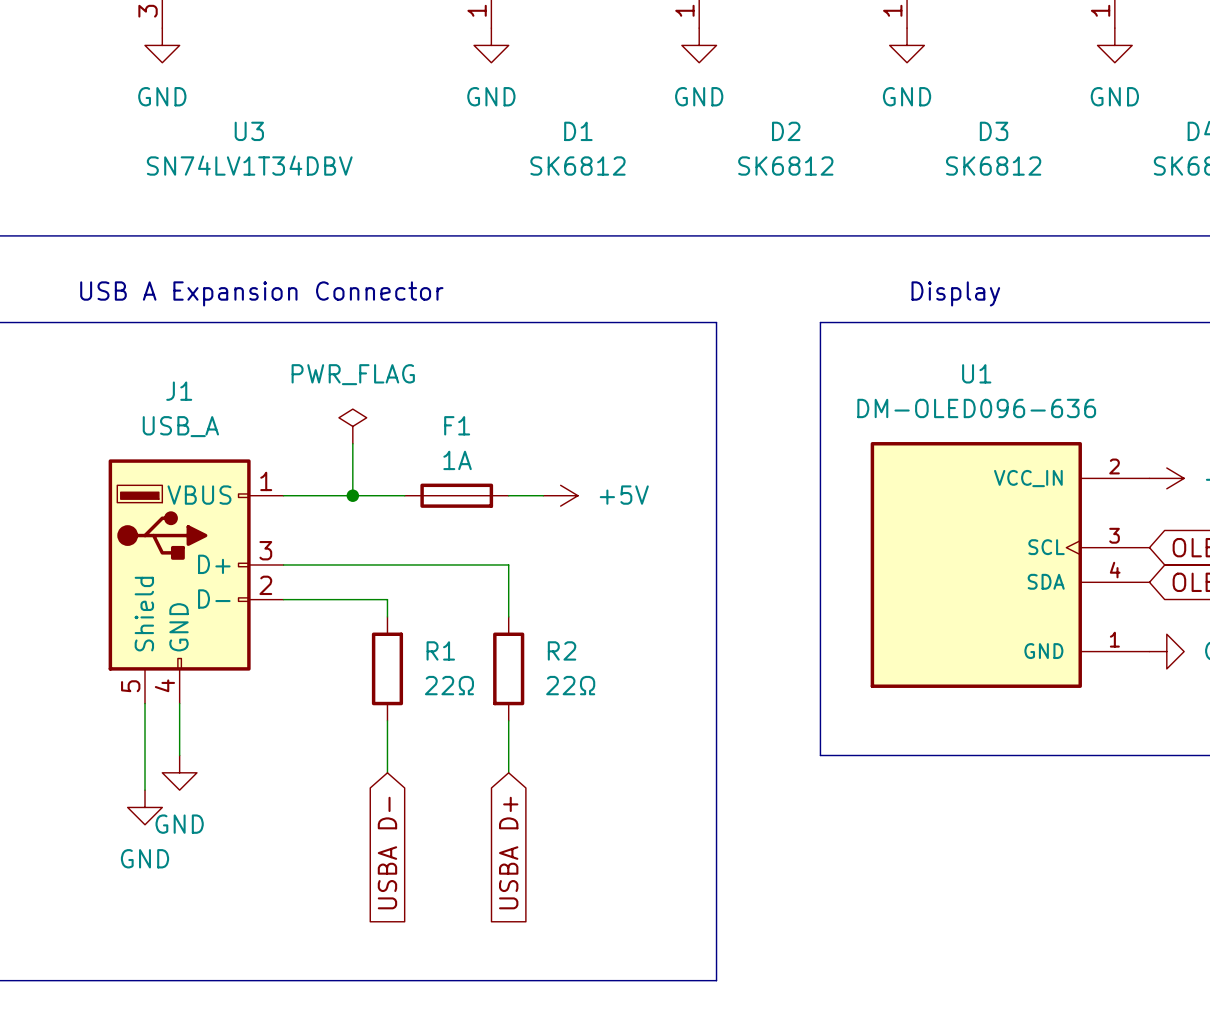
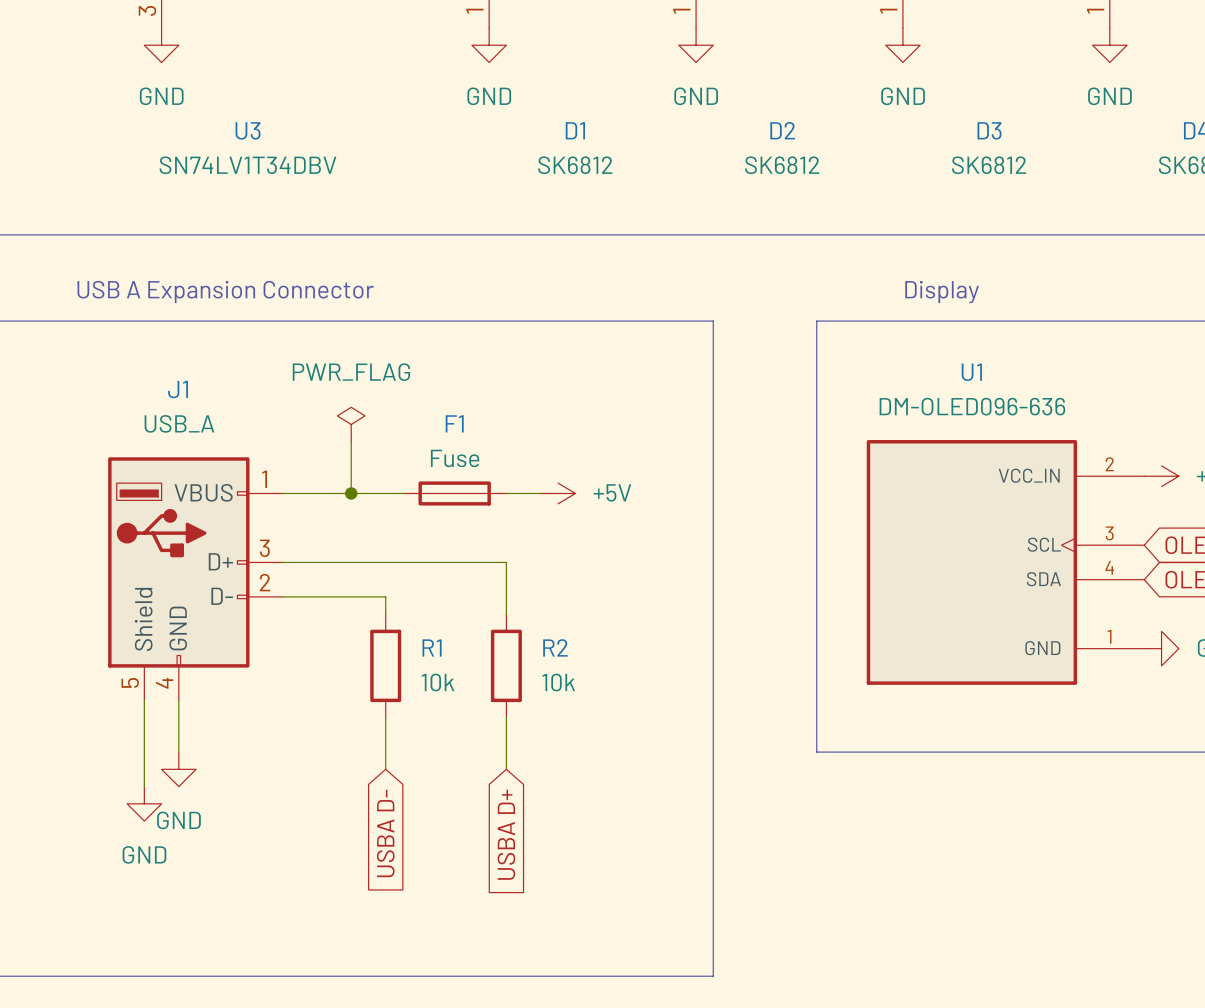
F1 value: 1A (457, 460) -> Fuse (455, 458)
R1 value: 22Ω (449, 685) -> 10k (437, 682)
R2 value: 22Ω (570, 685) -> 10k (558, 682)

